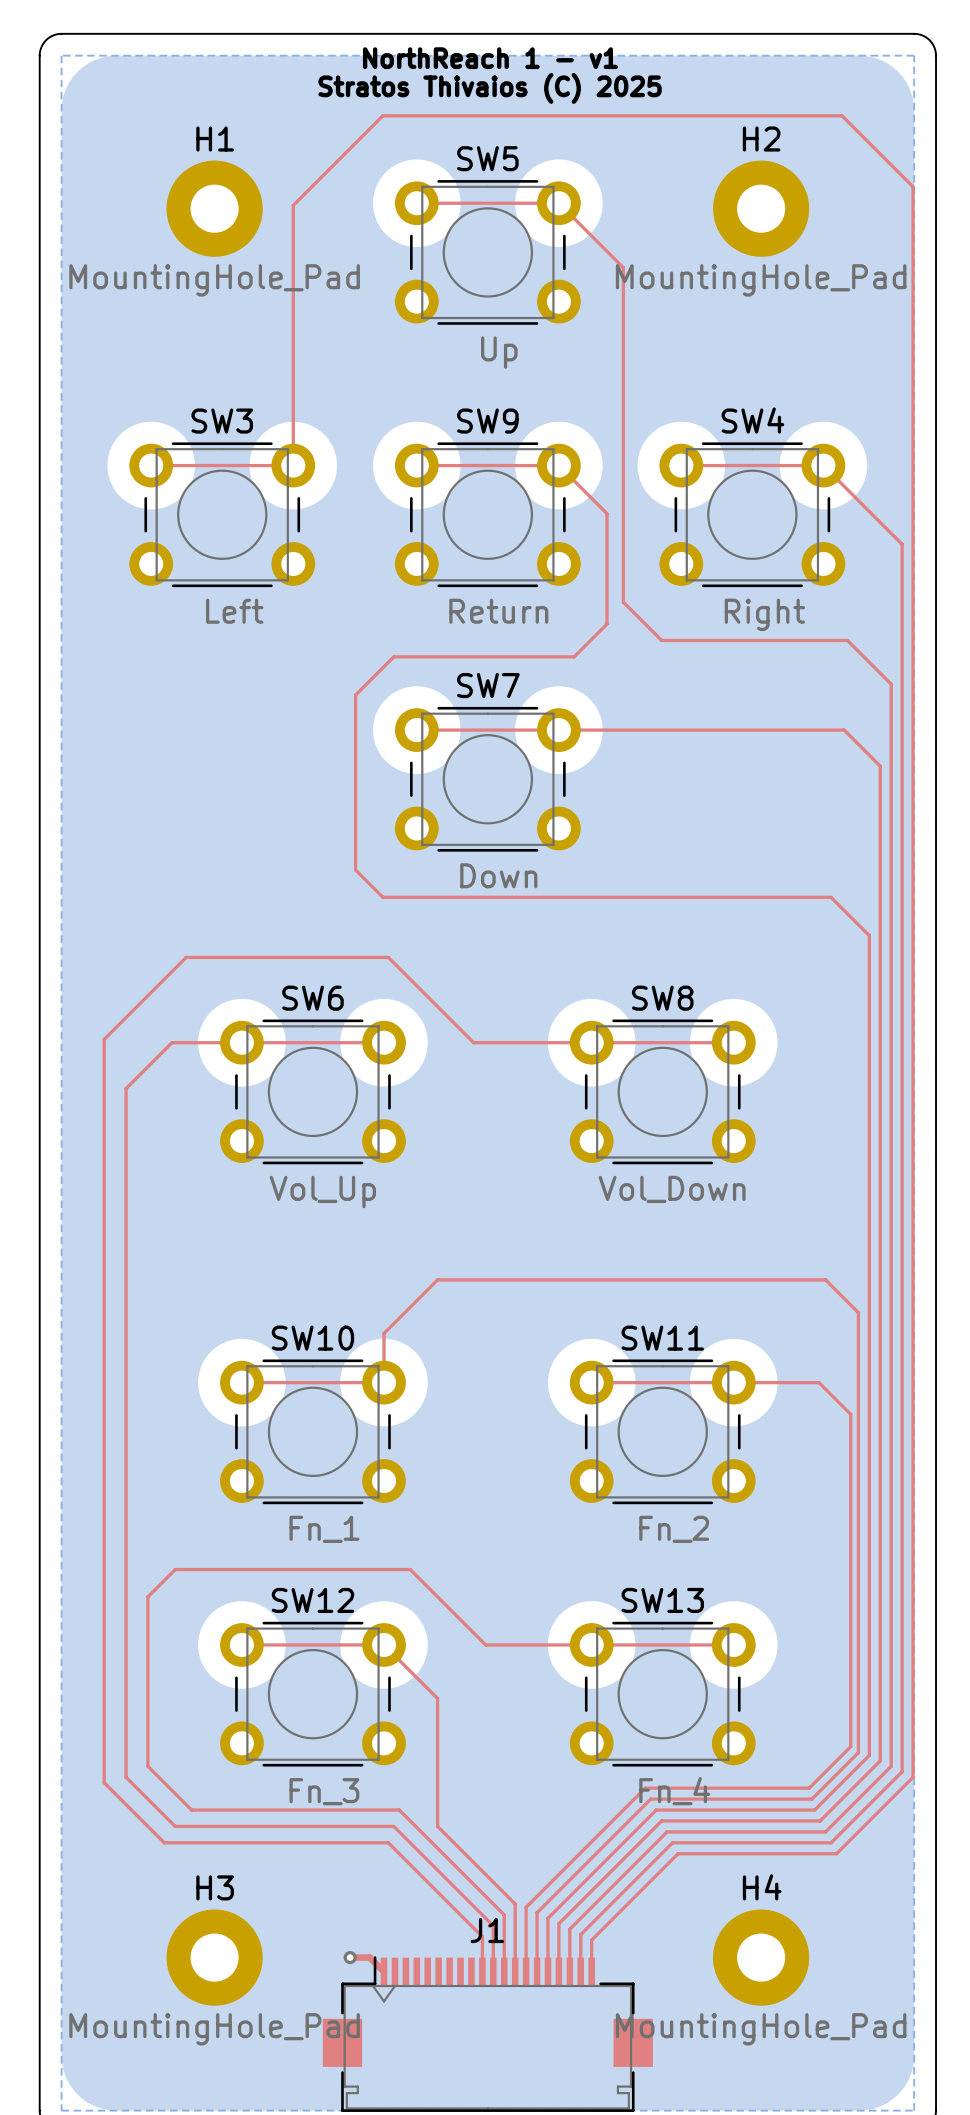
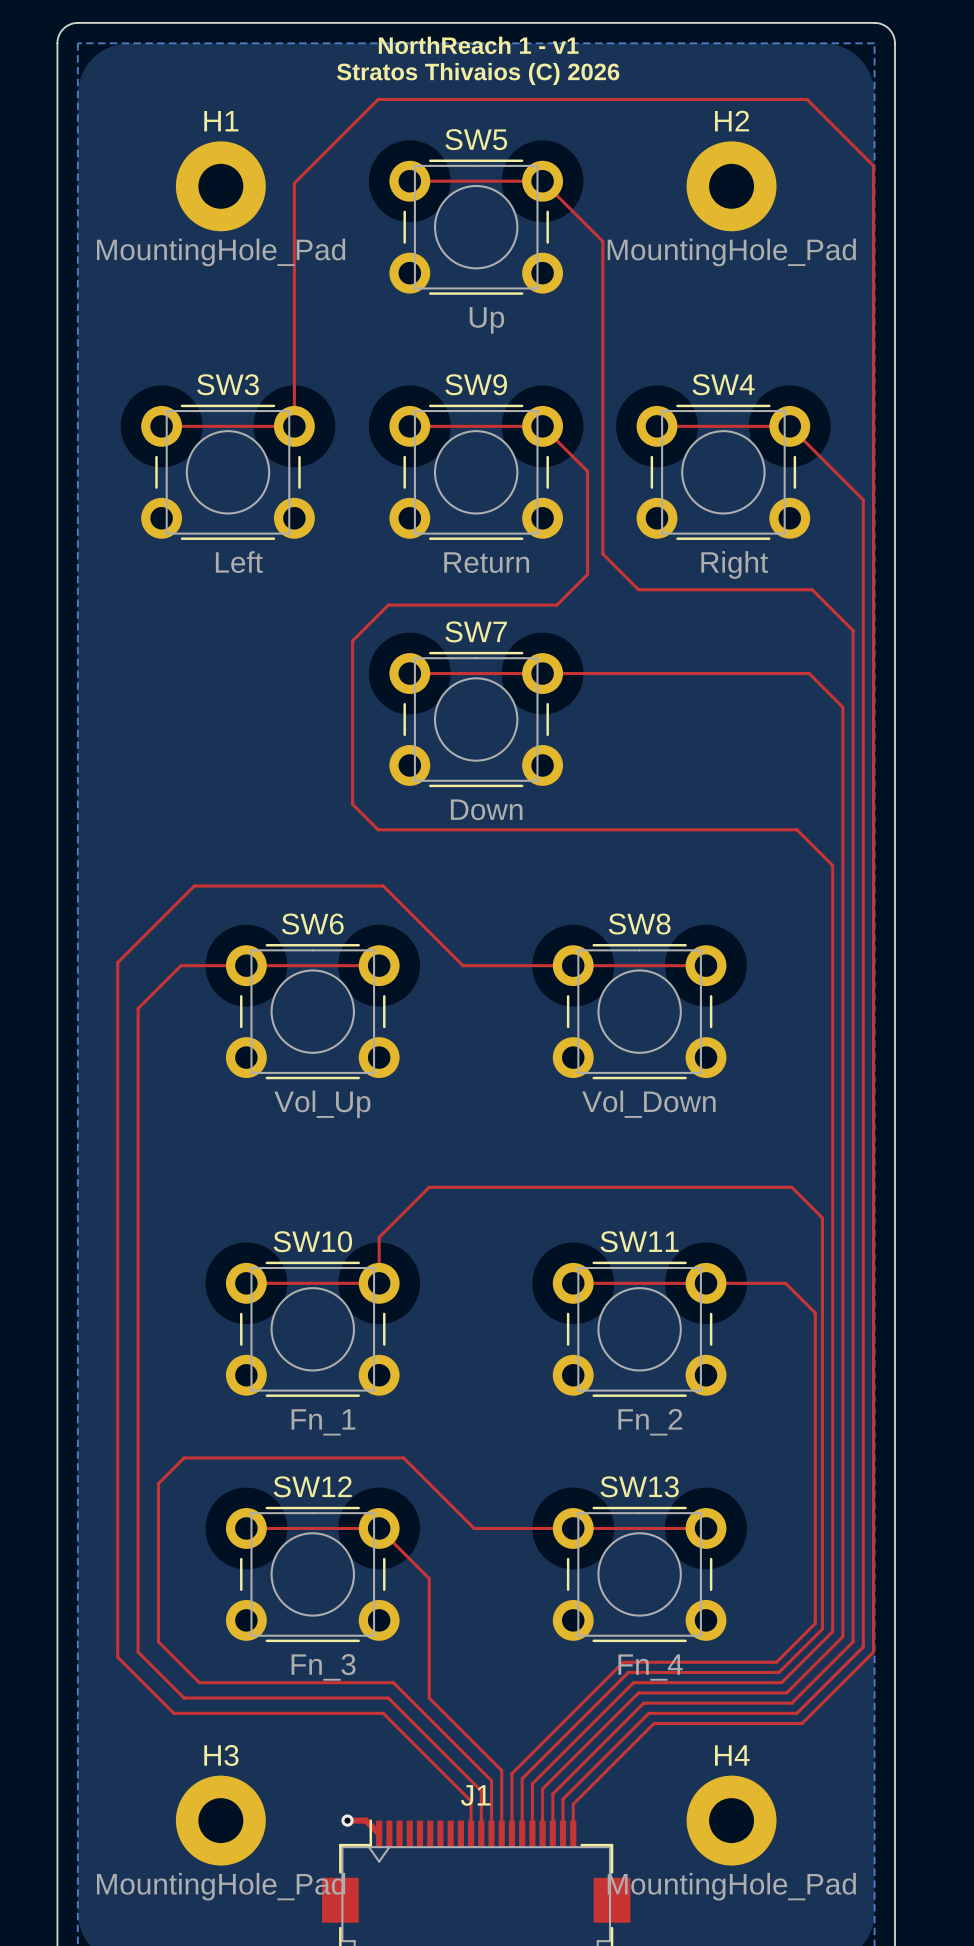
text: Stratos Thivaios (C) 2025 (490, 88) -> Stratos Thivaios (C) 2026 (478, 73)

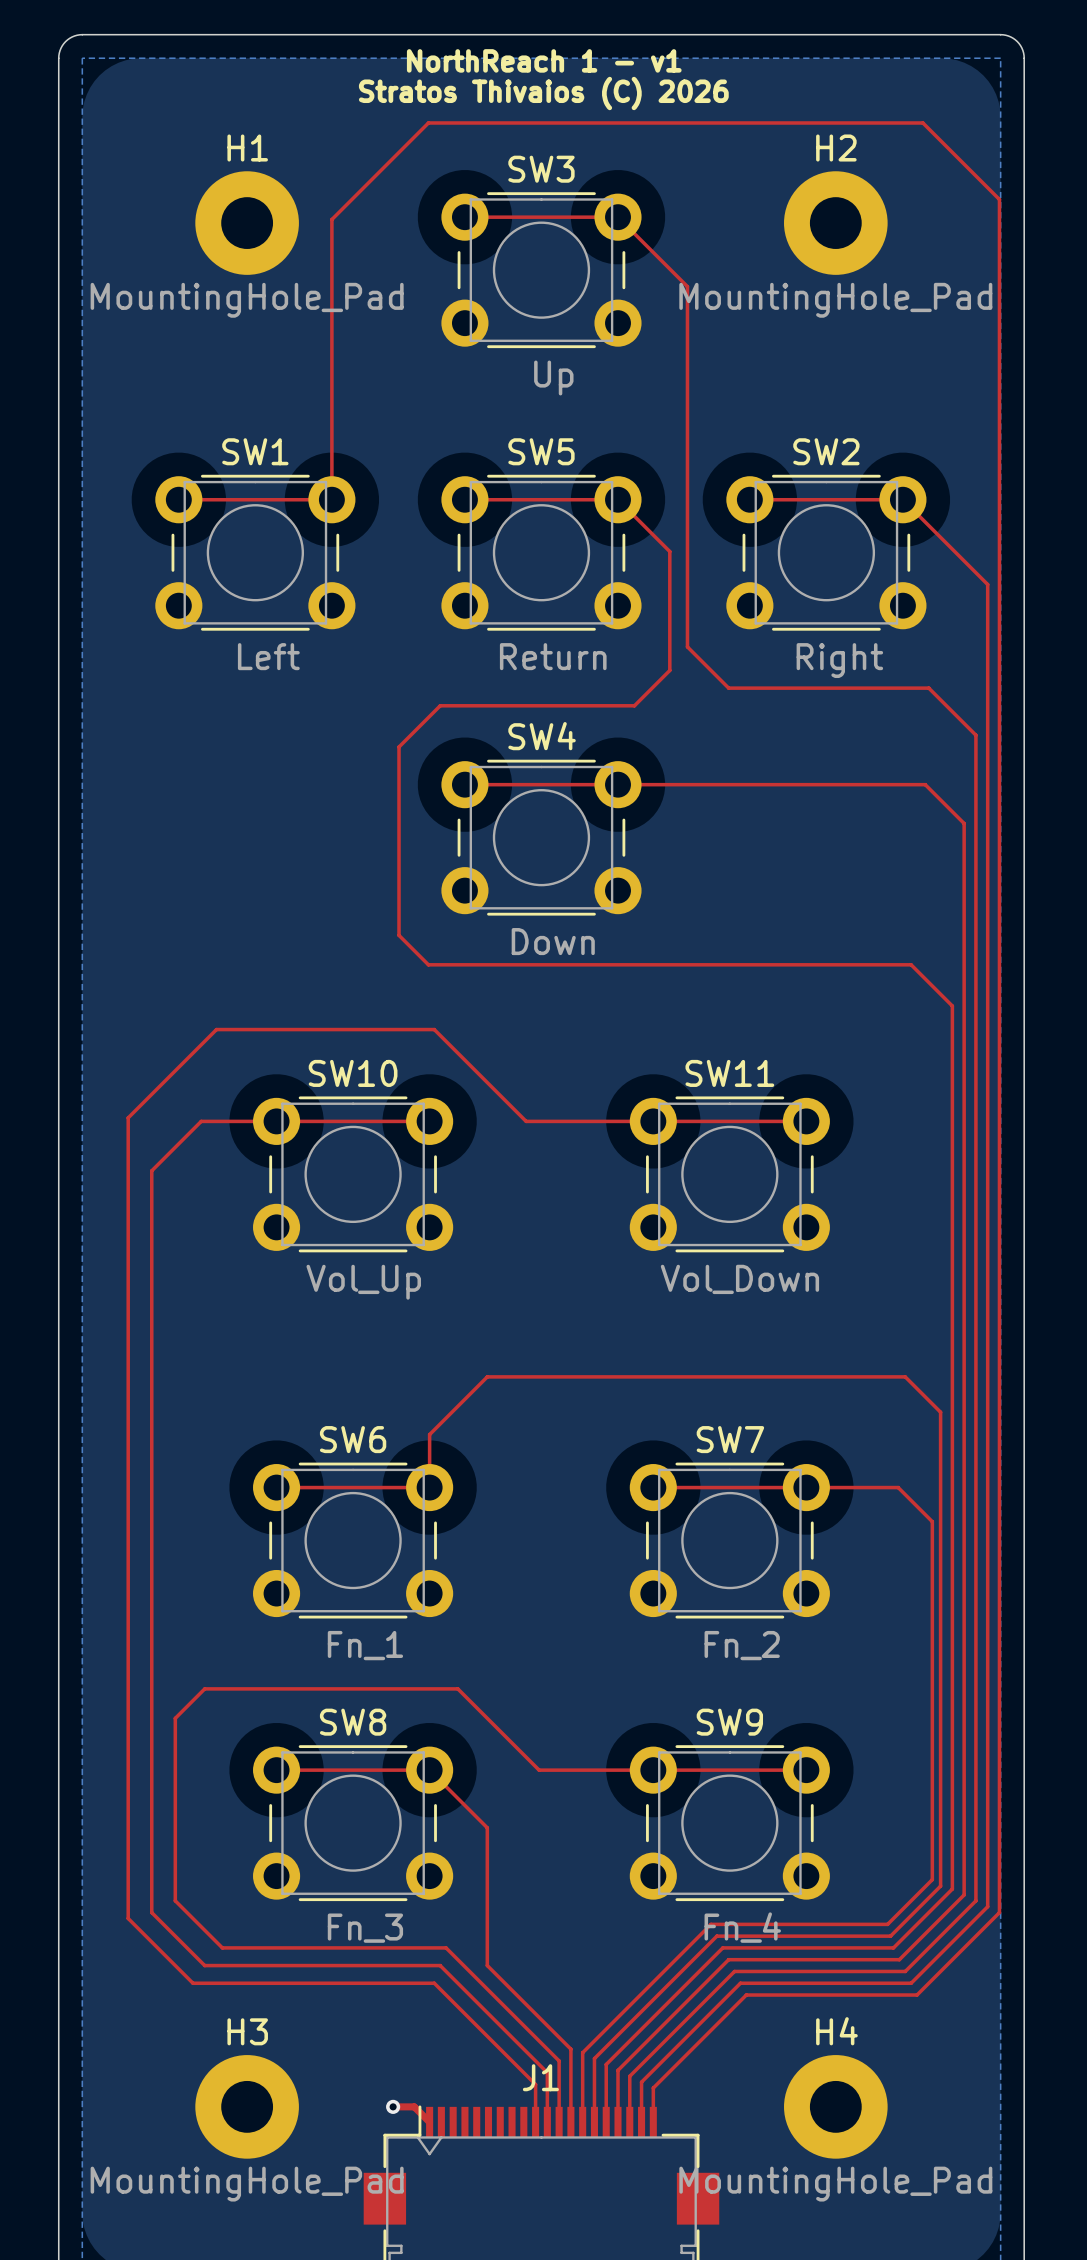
SW5 name: SW5 (476, 139) -> SW3 (541, 169)
SW3 name: SW3 (228, 384) -> SW1 (255, 451)
SW9 name: SW9 (476, 384) -> SW5 (541, 451)
SW4 name: SW4 (723, 384) -> SW2 (826, 451)
SW7 name: SW7 (476, 631) -> SW4 (542, 736)
SW6 name: SW6 (312, 924) -> SW10 (353, 1073)
SW8 name: SW8 (639, 924) -> SW11 (729, 1073)
SW10 name: SW10 (312, 1241) -> SW6 (353, 1439)
SW11 name: SW11 (639, 1241) -> SW7 (730, 1439)
SW12 name: SW12 (312, 1486) -> SW8 (353, 1722)
SW13 name: SW13 (639, 1486) -> SW9 (729, 1722)

